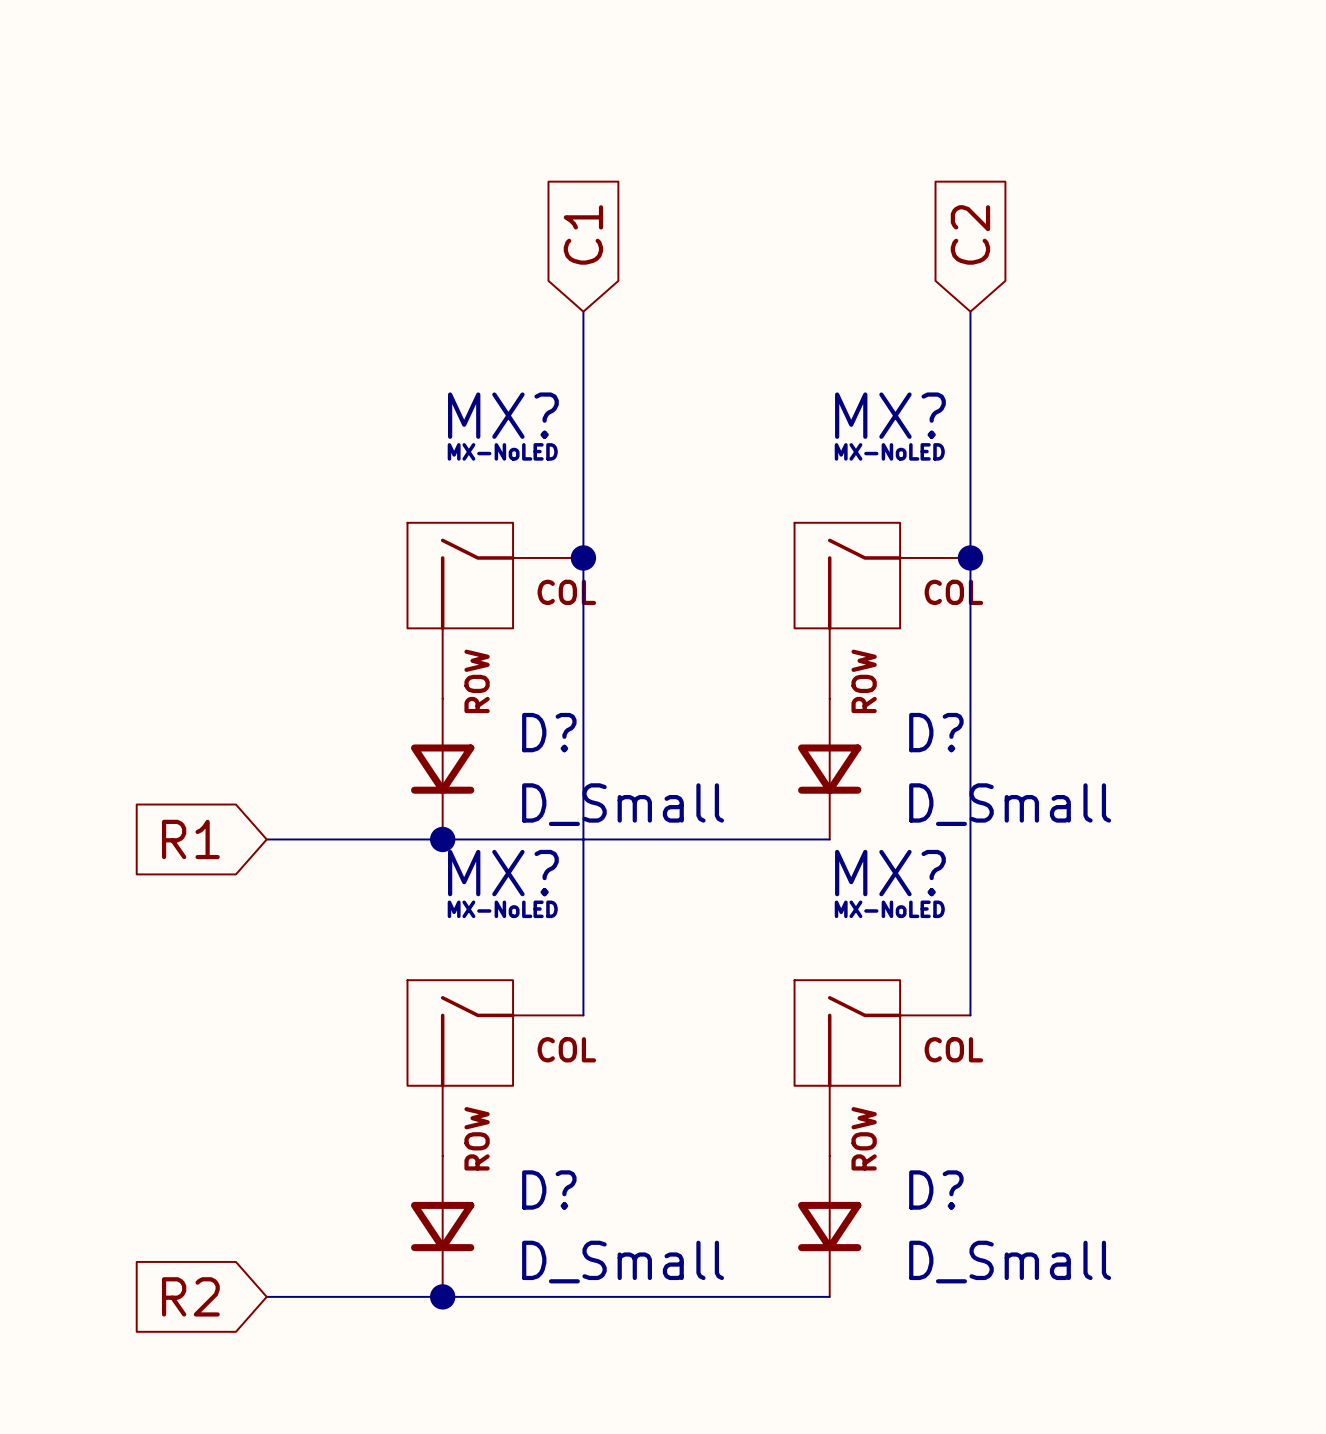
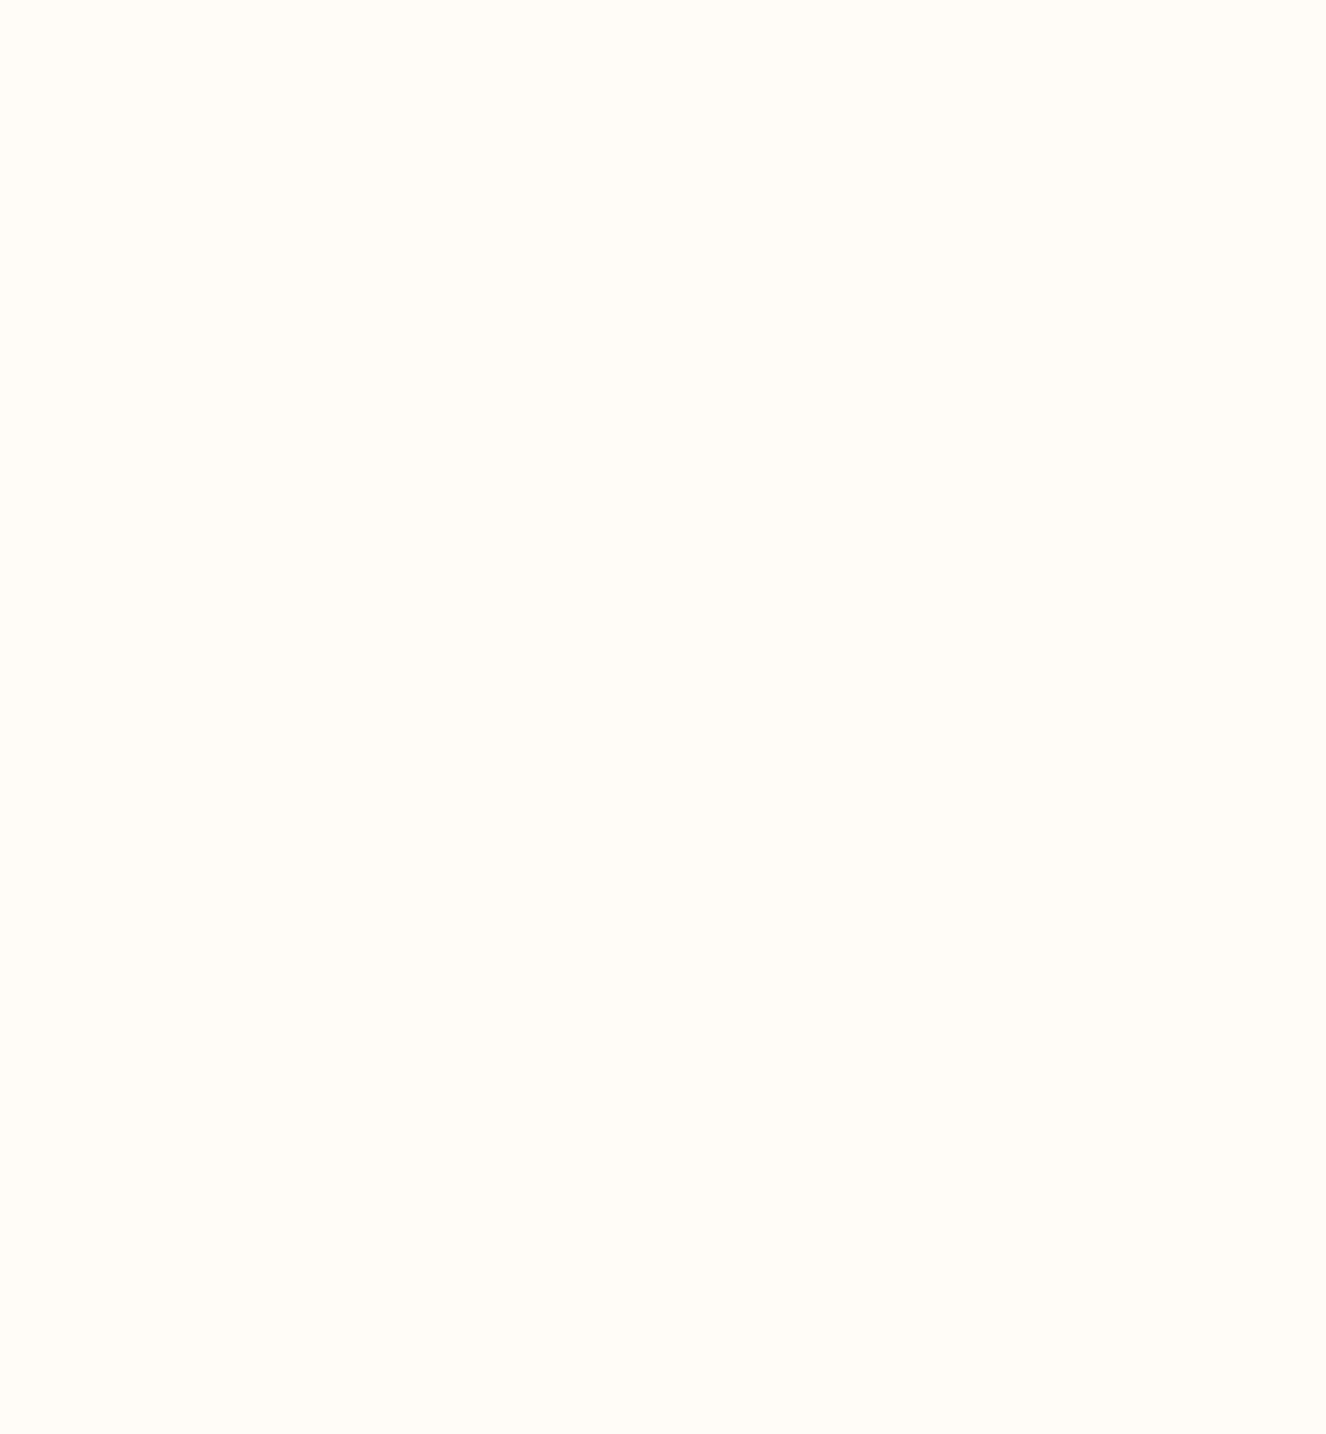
global label: C1 (583, 234) -> none
global label: C2 (970, 234) -> none
wire: (583, 311) (583, 1015) -> none
wire: (970, 311) (970, 1015) -> none
junction: (583, 557) -> none
junction: (970, 557) -> none
MX?: MX-NoLED (495, 610) -> none
MX?: MX-NoLED (882, 610) -> none
D?: D_Small (442, 769) -> none
D?: D_Small (829, 769) -> none
global label: R1 (190, 839) -> none
wire: (266, 839) (829, 839) -> none
junction: (442, 839) -> none
MX?: MX-NoLED (495, 1068) -> none
MX?: MX-NoLED (882, 1068) -> none
D?: D_Small (442, 1226) -> none
D?: D_Small (829, 1226) -> none
global label: R2 (190, 1296) -> none
wire: (266, 1296) (829, 1296) -> none
junction: (442, 1296) -> none

